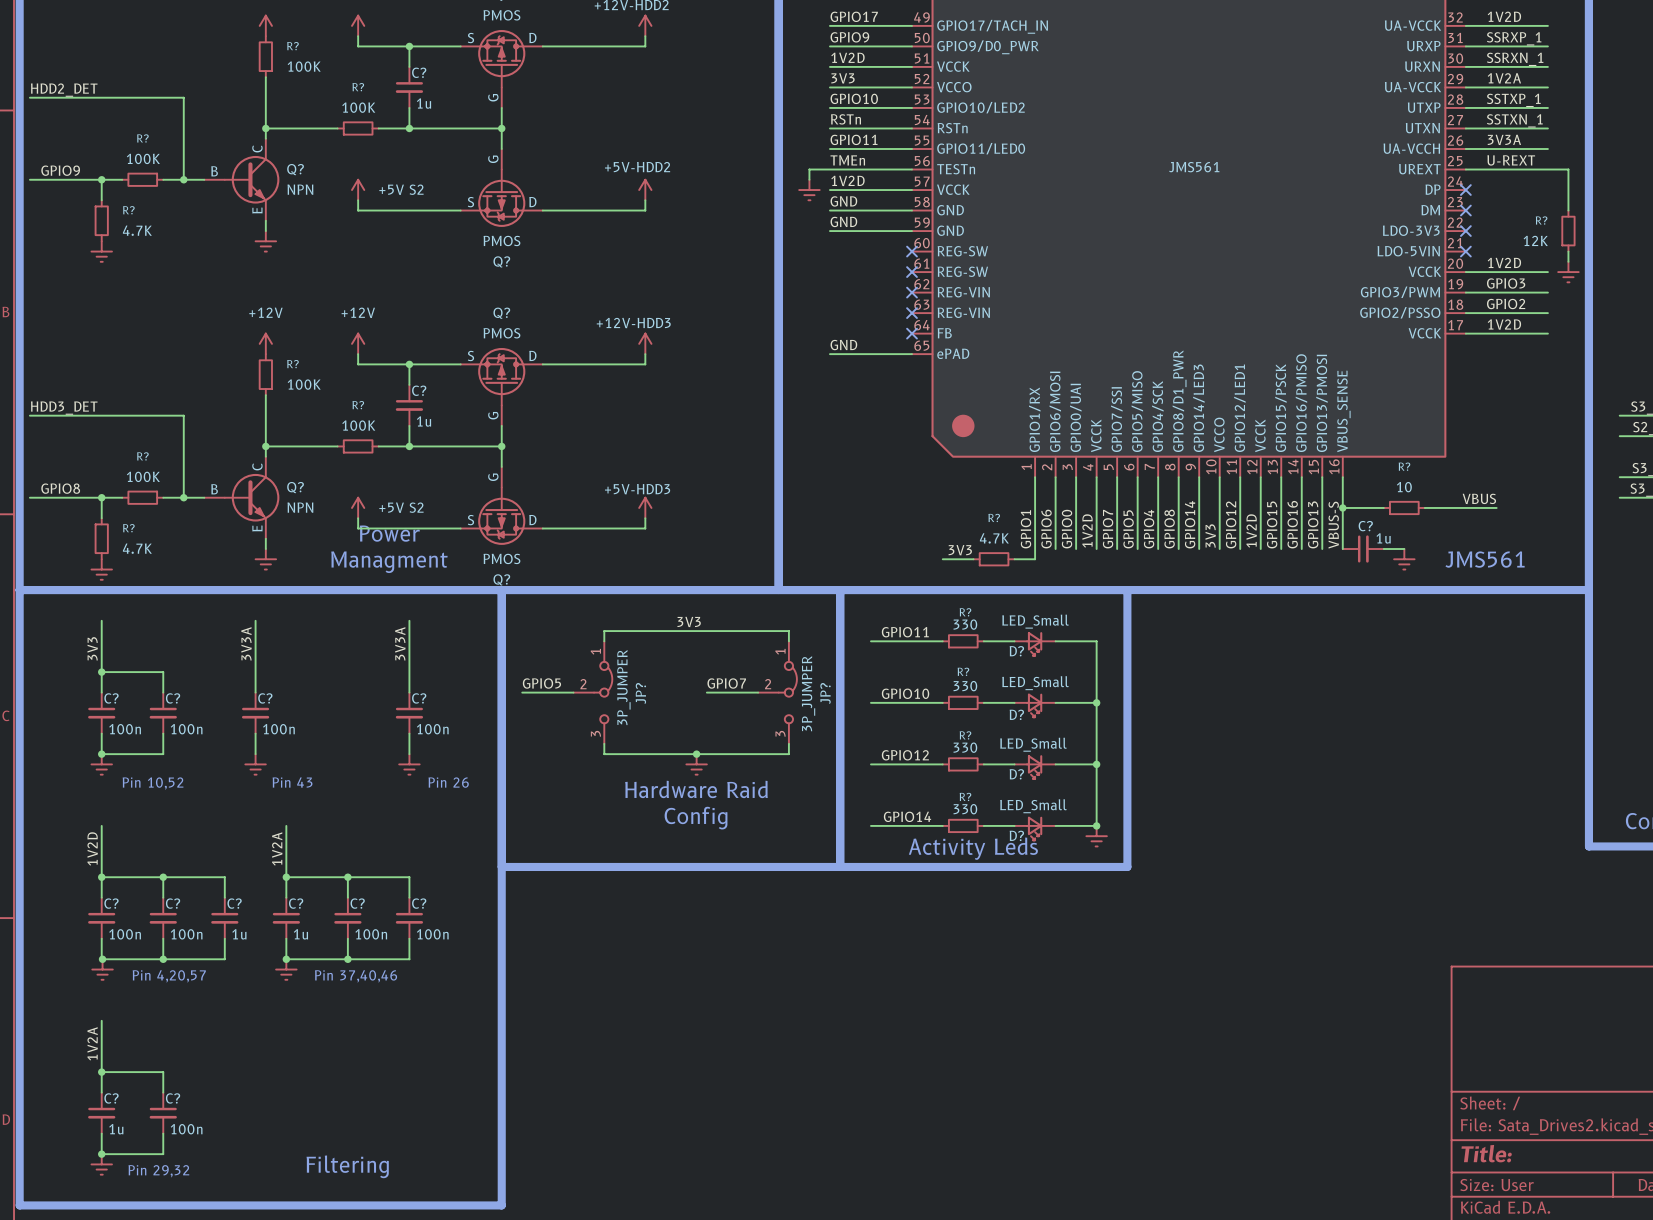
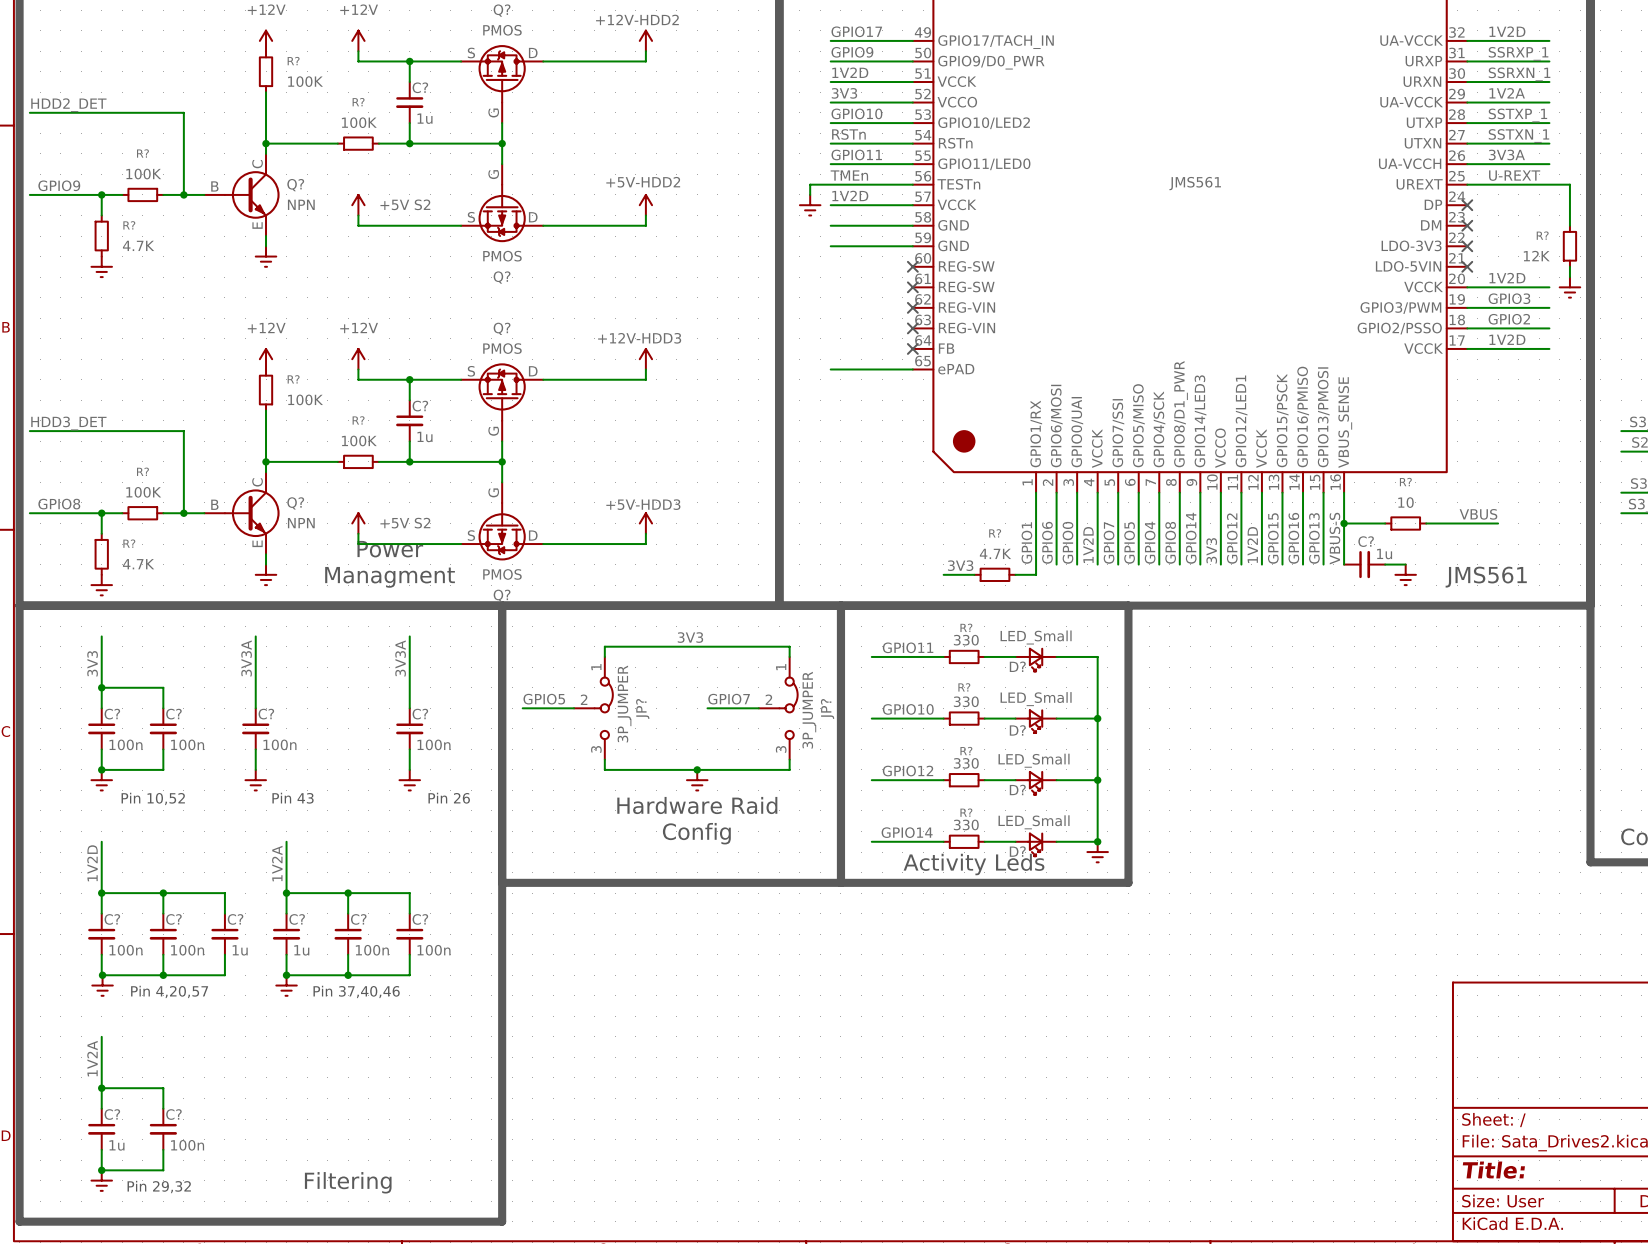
label: GND (843, 201) -> none
label: GND (843, 221) -> none
label: GND (843, 345) -> none

